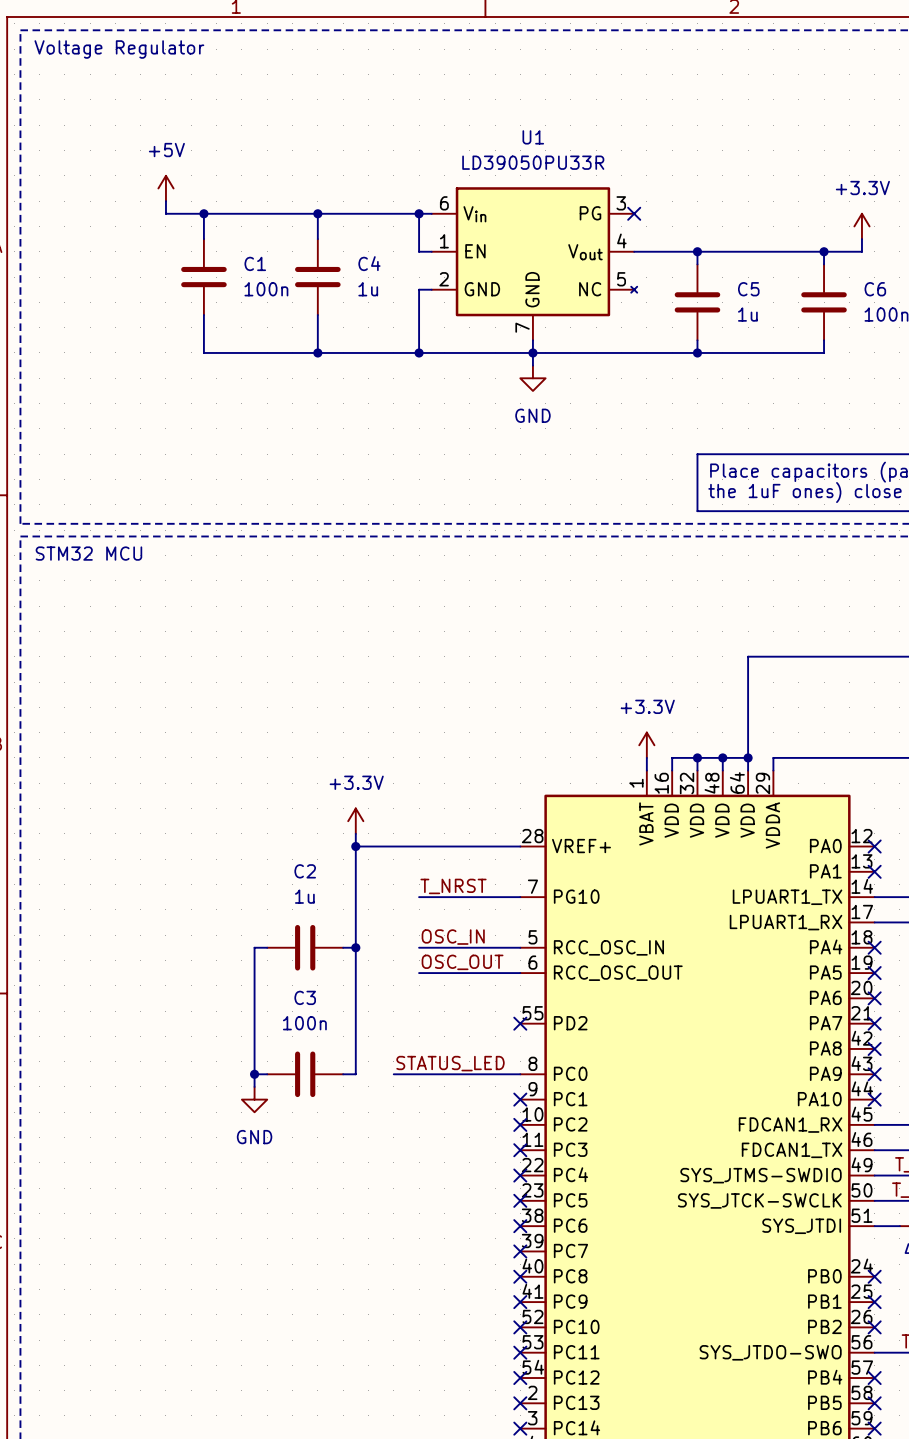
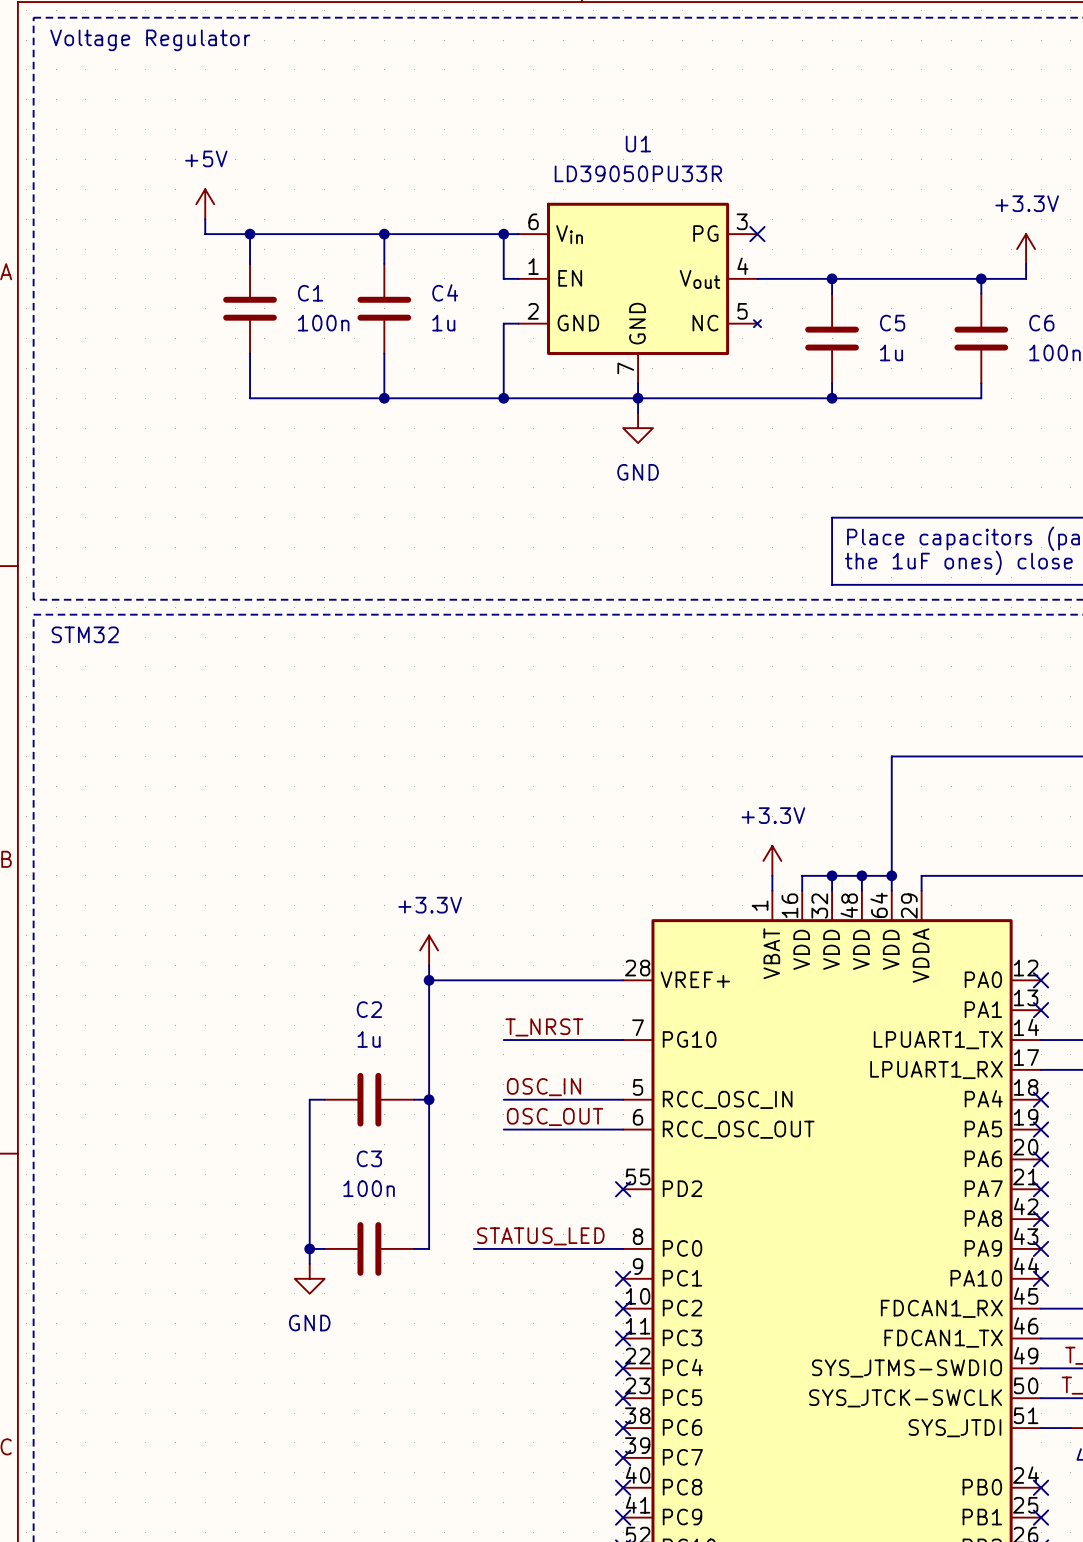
text: STM32 MCU (88, 553) -> STM32 (85, 634)

